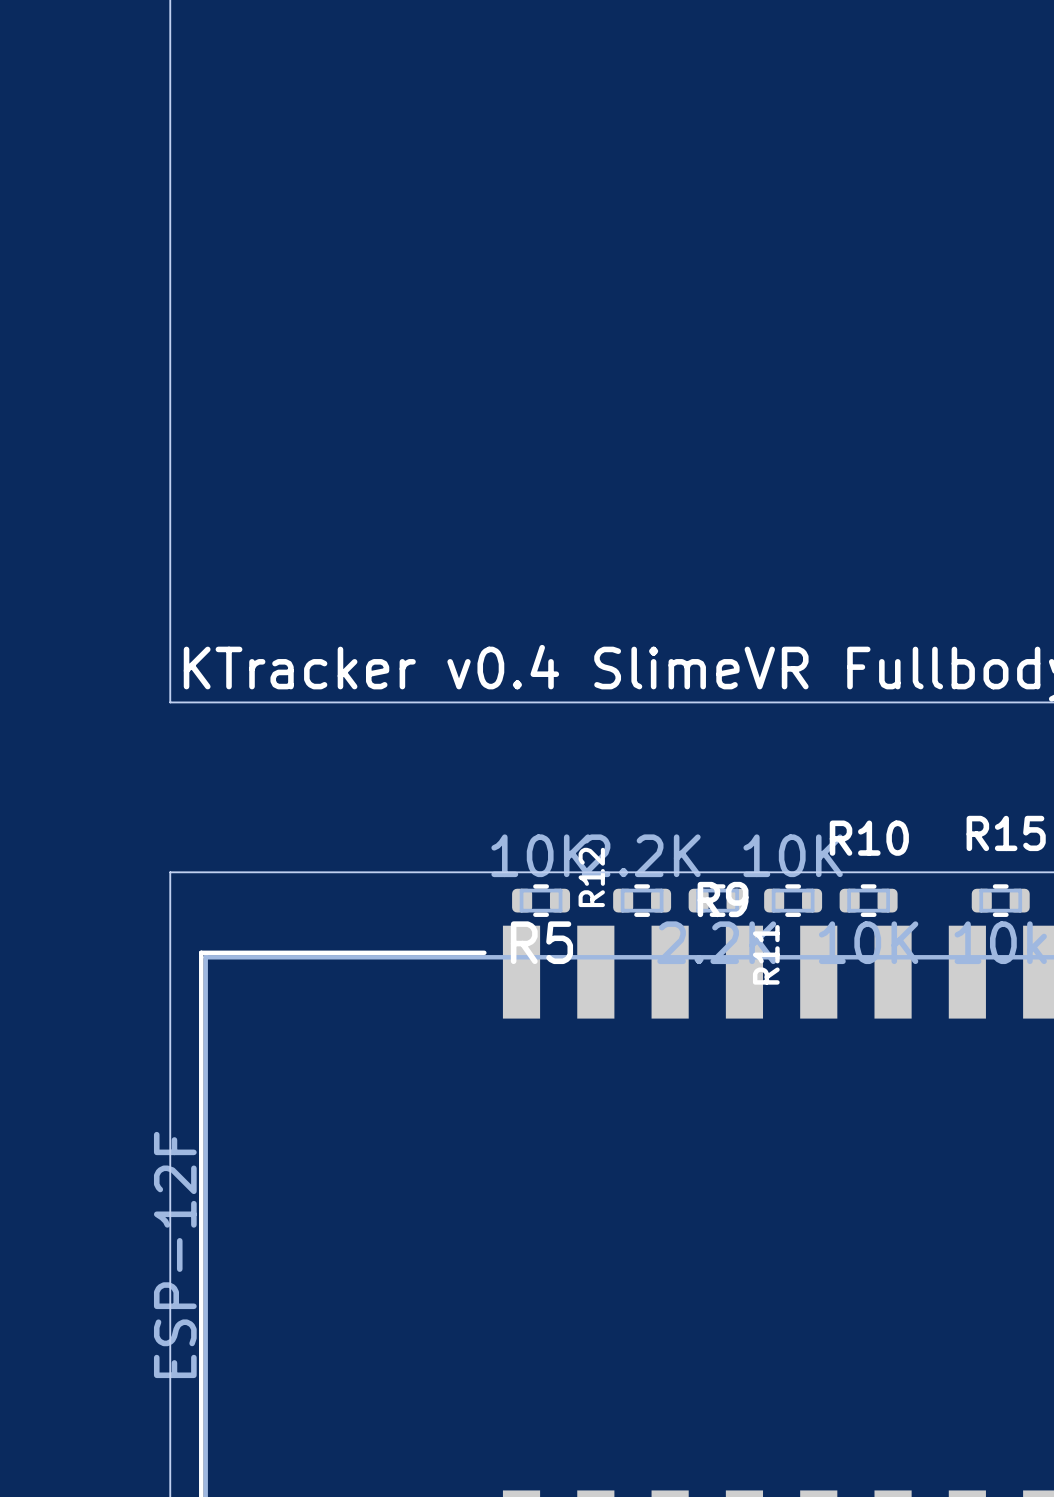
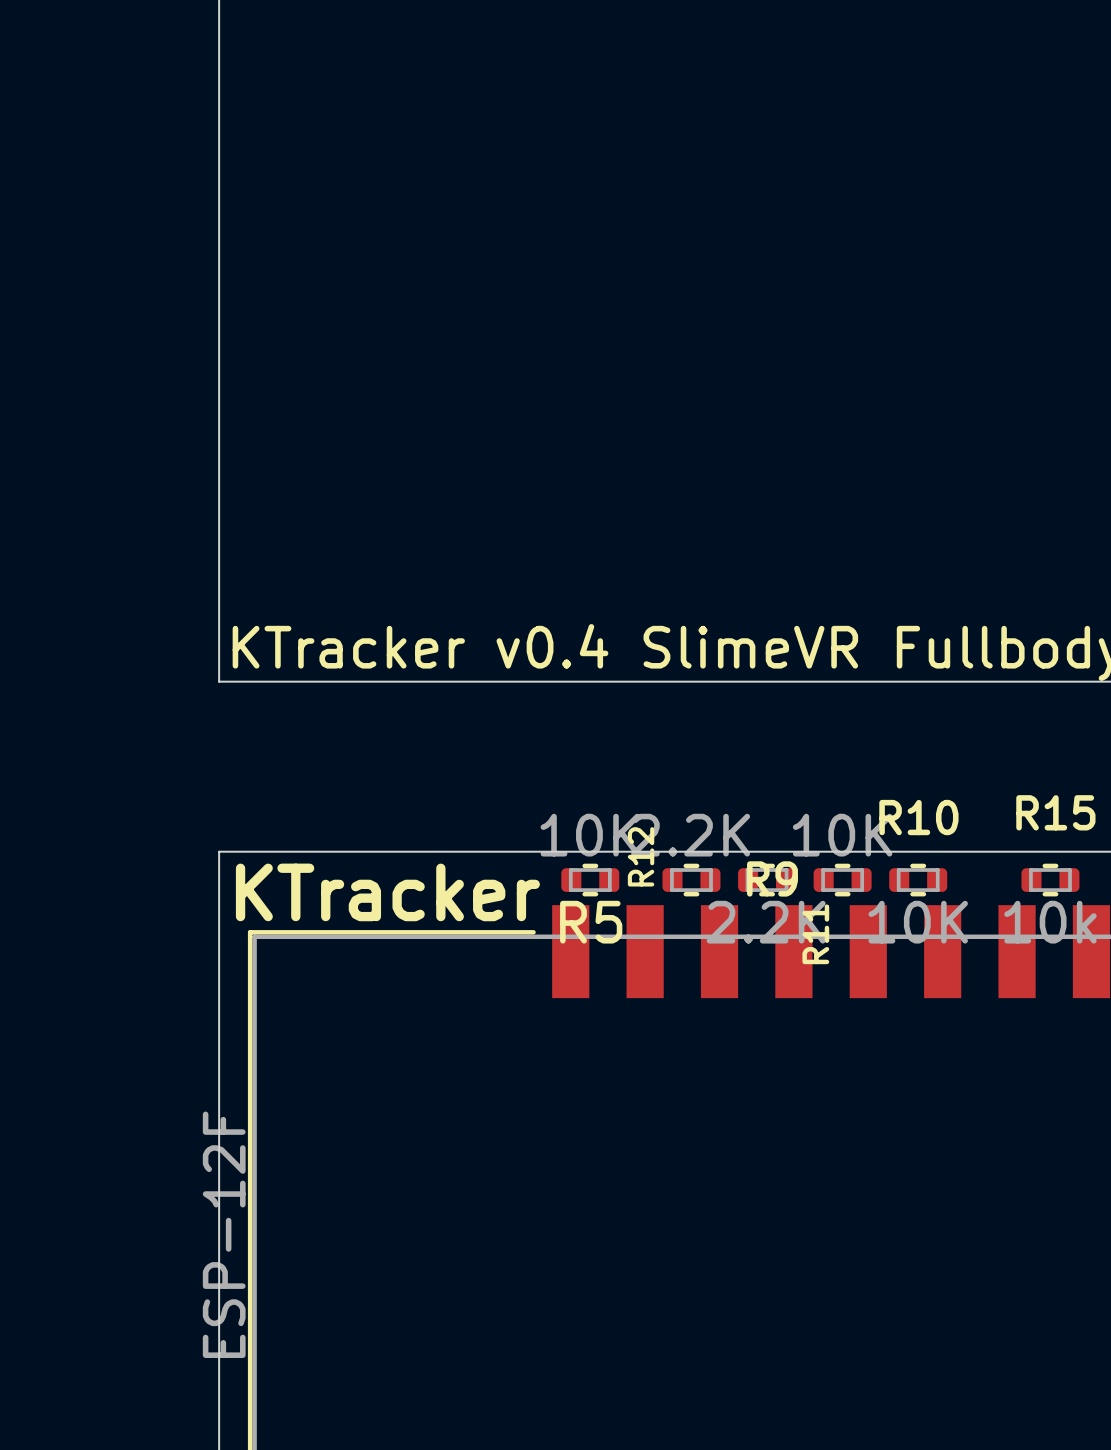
text: none -> KTracker (387, 892)

